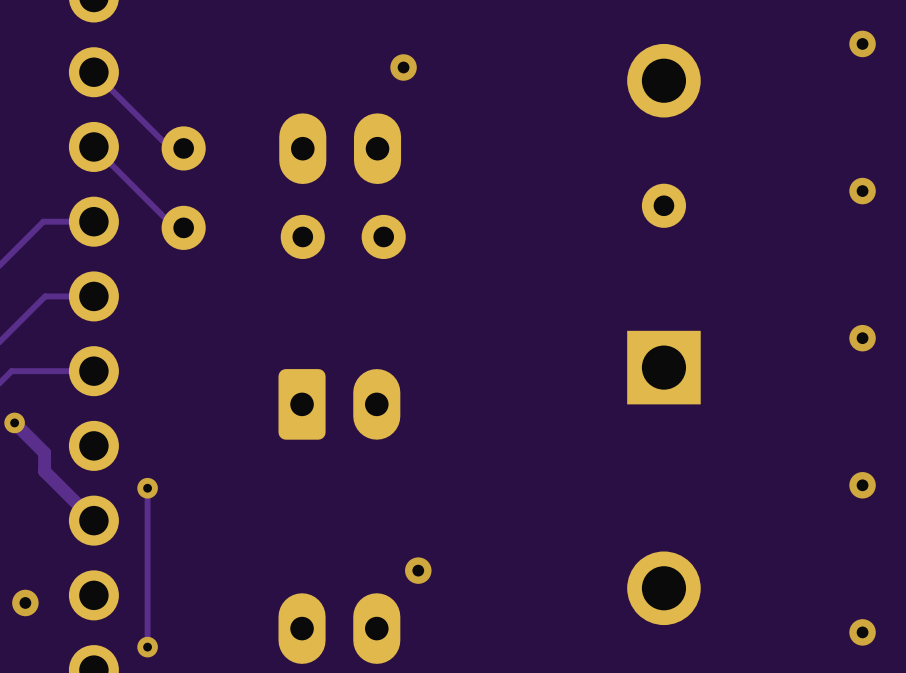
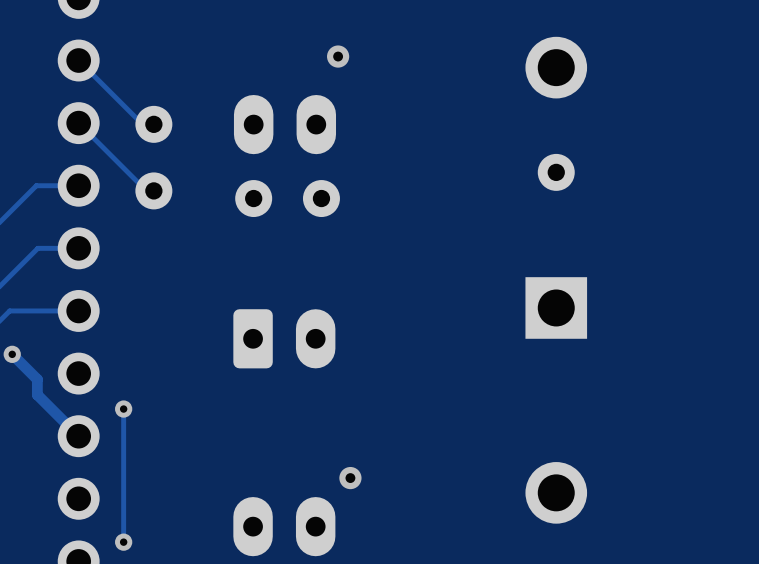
via: (862, 43) -> none
via: (862, 191) -> none
via: (862, 338) -> none
via: (862, 485) -> none
via: (25, 602) -> none
via: (862, 632) -> none

